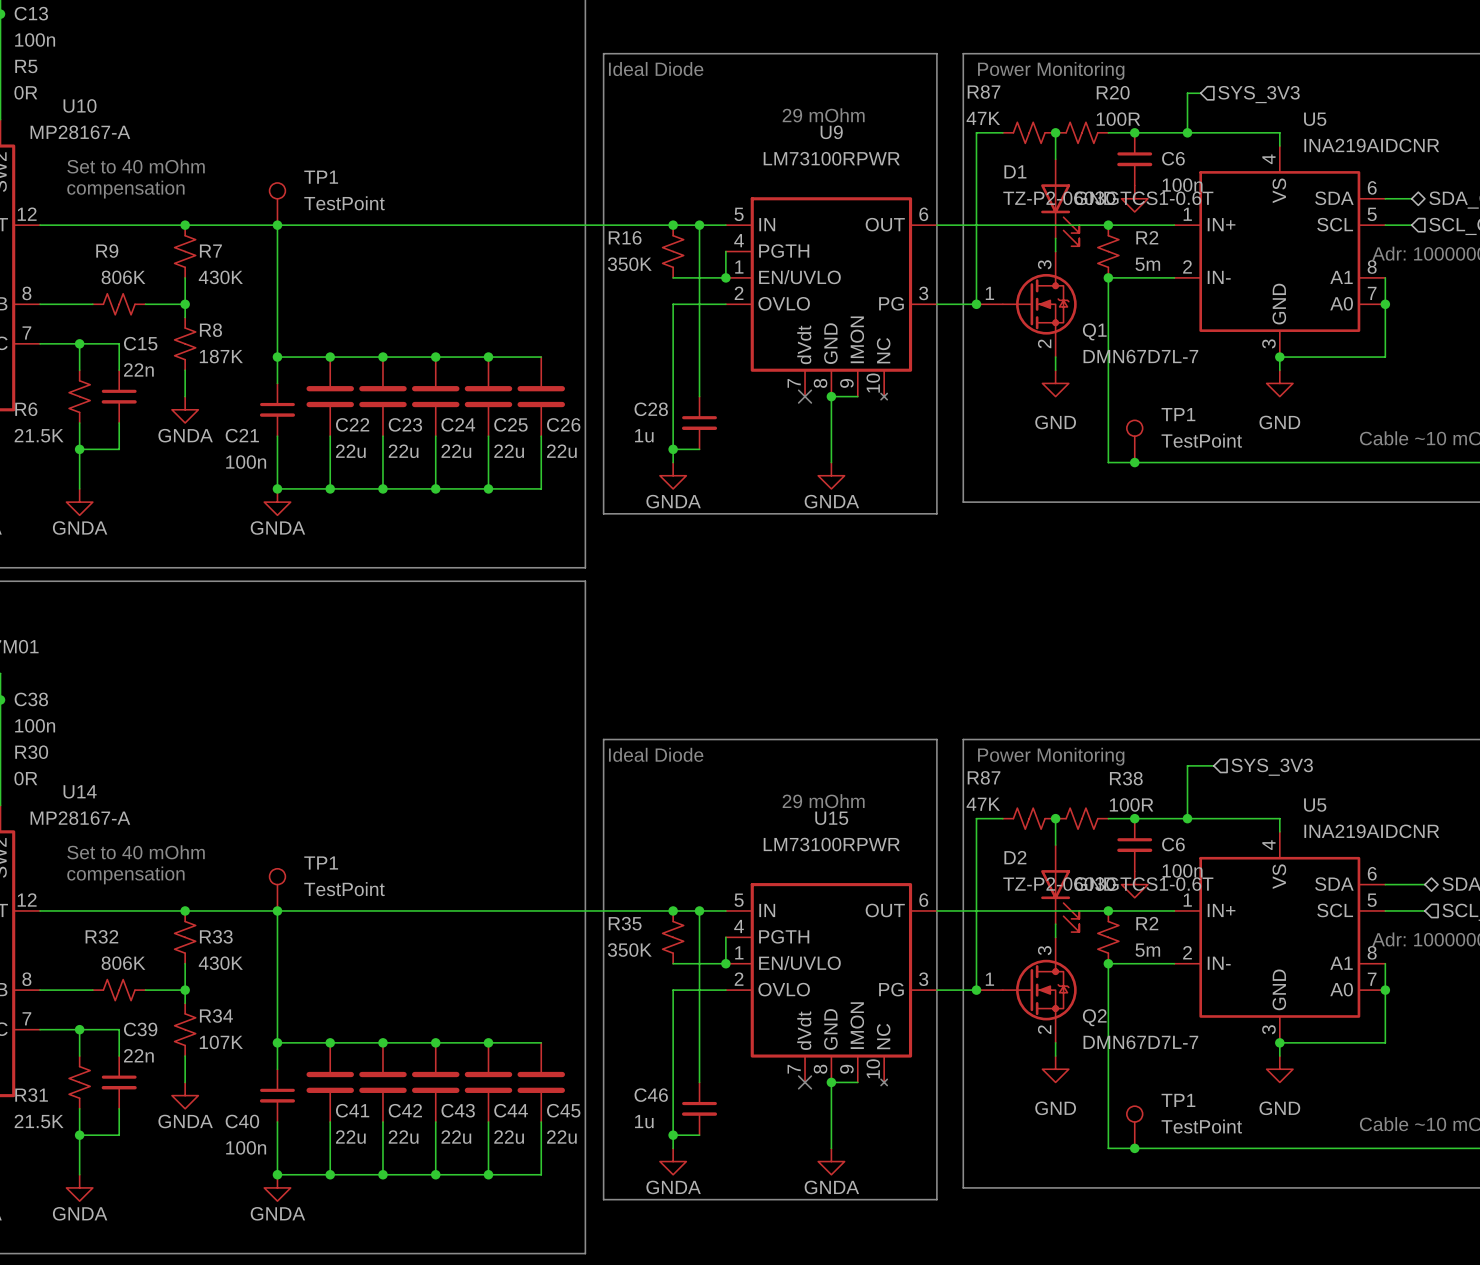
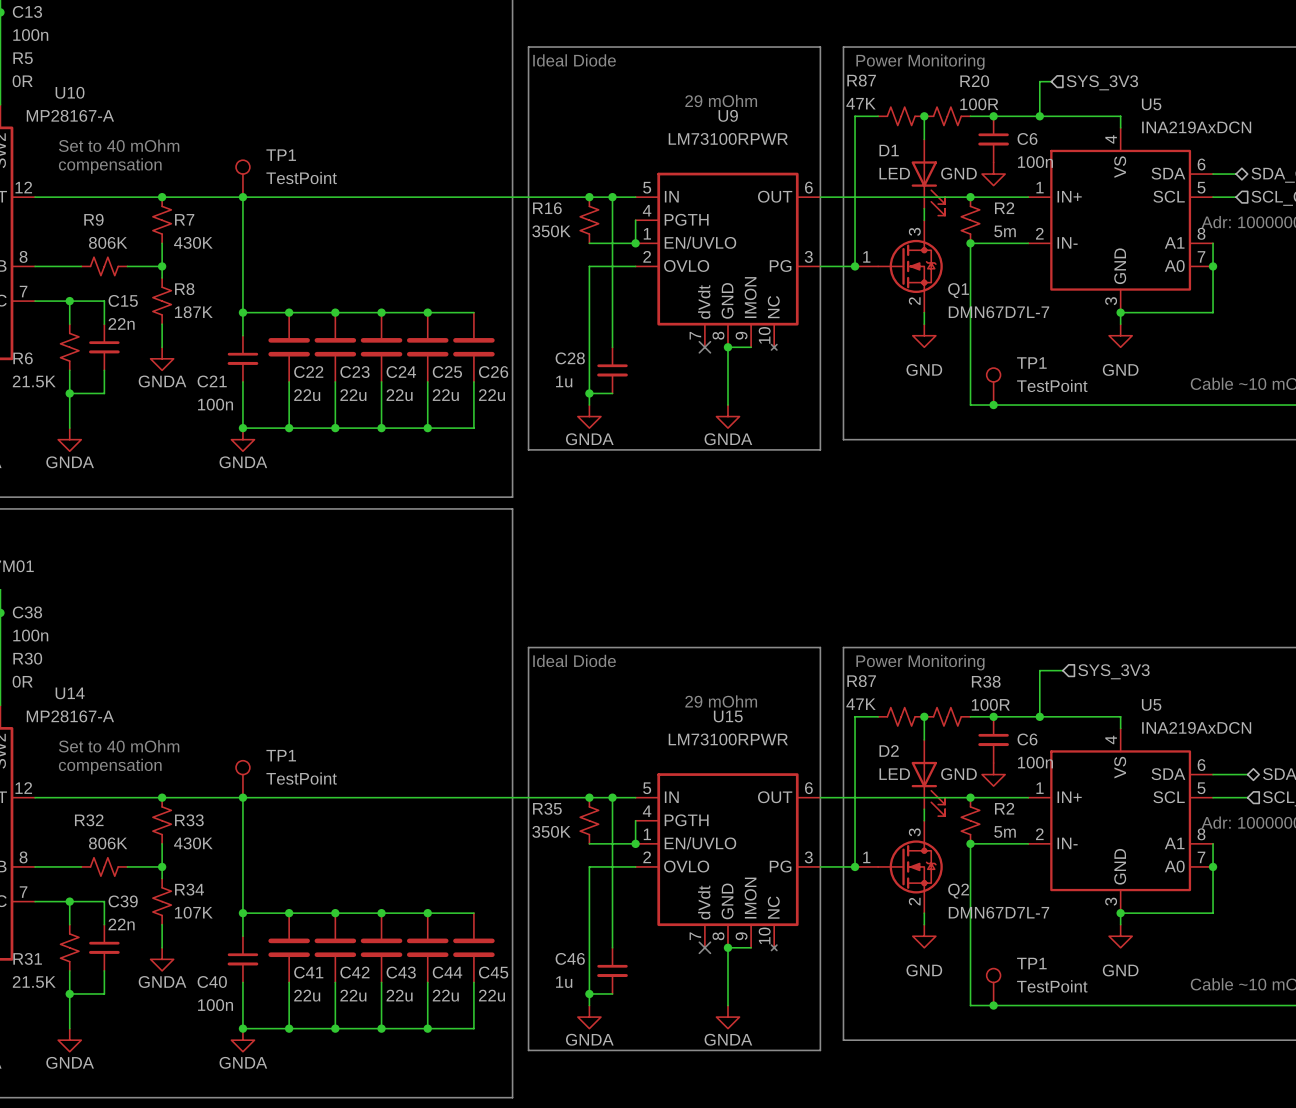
U5 value: INA219AIDCNR (1371, 145) -> INA219AxDCN (1196, 127)
D1 value: TZ-P2-0603GTCS1-0.6T (1108, 198) -> LED (894, 173)
U5 value: INA219AIDCNR (1371, 831) -> INA219AxDCN (1196, 727)
D2 value: TZ-P2-0603GTCS1-0.6T (1108, 884) -> LED (894, 774)

